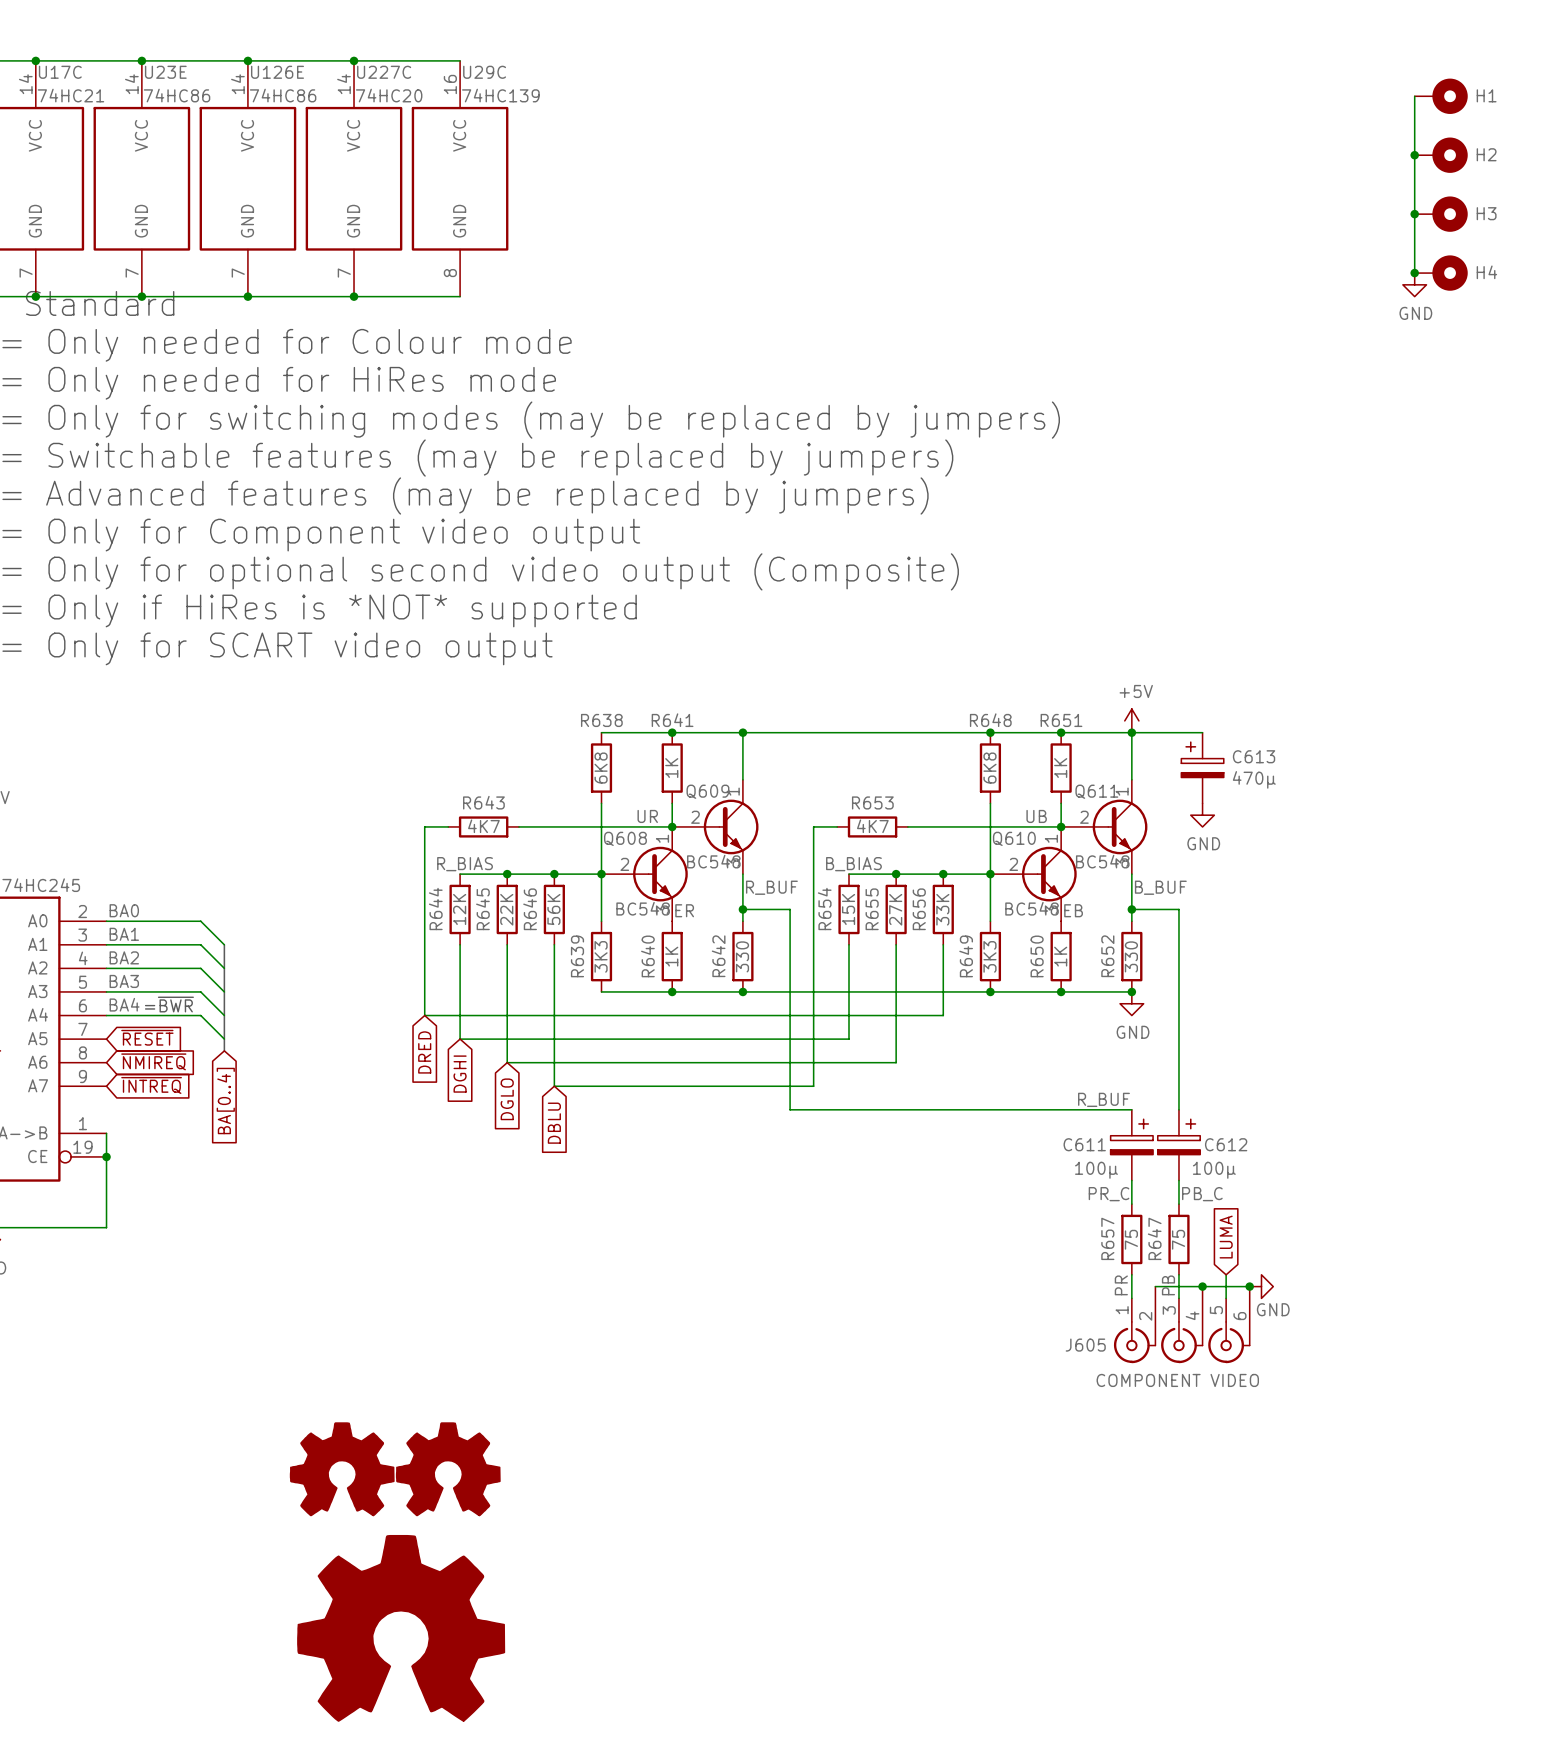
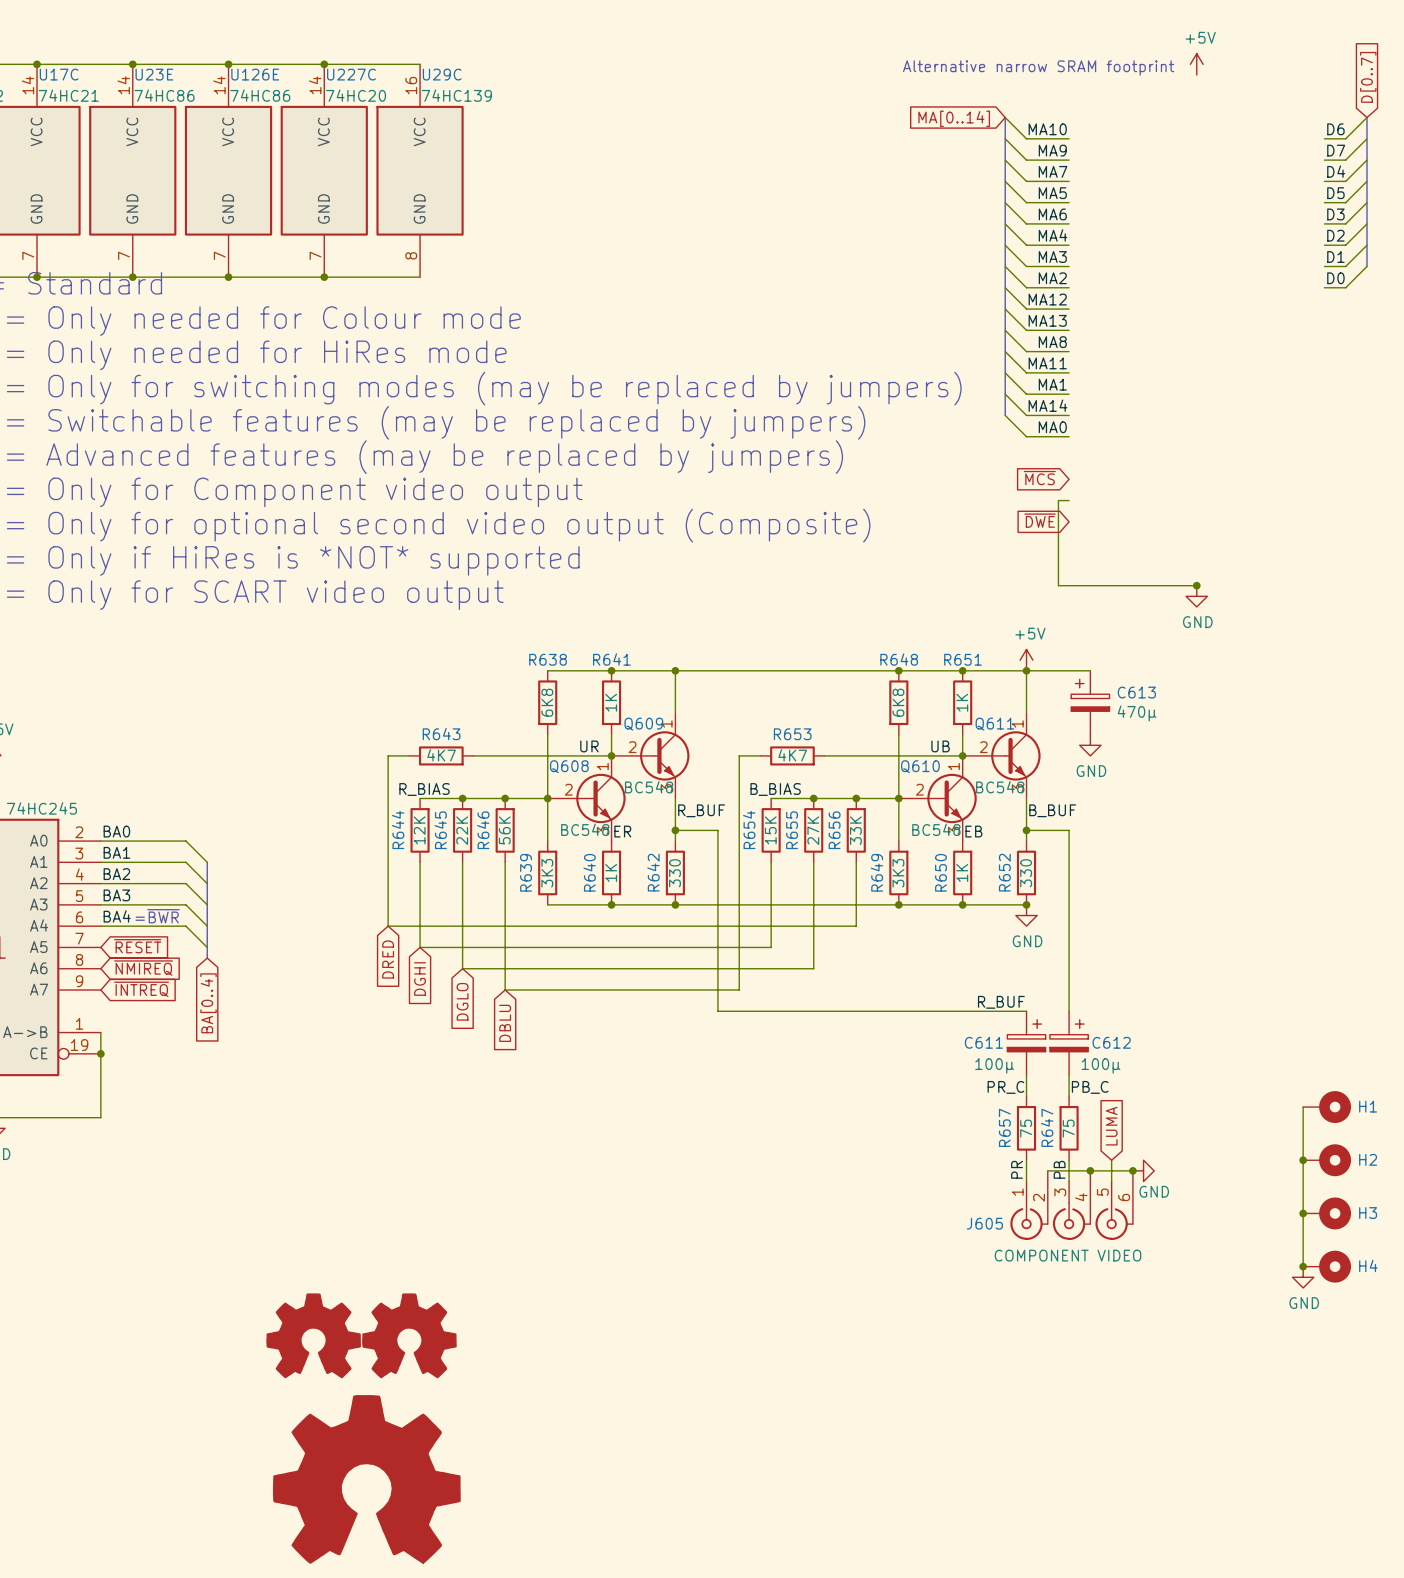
power symbol: none -> +5V (1196, 64)
text: none -> Alternative narrow SRAM footprint (1038, 68)
global label: none -> D[0..7] (1368, 77)
wire: (1414, 96) (1414, 273) -> none
H1 position: (1441, 96) -> (1327, 1107)
wire: none -> (1005, 117) (1026, 138) (1069, 138)
bus: none -> (1005, 117) (1005, 415)
wire: none -> (1366, 117) (1345, 138) (1324, 138)
bus: none -> (1366, 117) (1366, 266)
global label: none -> MA[0..14] (954, 118)
label: none -> MA10 (1047, 129)
label: none -> D6 (1335, 129)
wire: none -> (1005, 138) (1026, 160) (1069, 160)
wire: none -> (1366, 138) (1345, 160) (1324, 160)
junction: (1414, 155) -> none
H2 position: (1441, 155) -> (1327, 1160)
label: none -> MA9 (1052, 150)
label: none -> D7 (1336, 150)
wire: none -> (1005, 160) (1026, 181) (1069, 181)
wire: none -> (1366, 160) (1345, 181) (1324, 181)
label: none -> D4 (1336, 171)
label: none -> MA7 (1053, 171)
wire: none -> (1005, 181) (1026, 202) (1069, 202)
wire: none -> (1366, 181) (1345, 202) (1324, 202)
label: none -> MA5 (1052, 193)
label: none -> D5 (1335, 193)
wire: none -> (1005, 202) (1026, 223) (1069, 223)
junction: (1414, 214) -> none
H3 position: (1441, 214) -> (1327, 1213)
wire: none -> (1366, 202) (1345, 223) (1324, 223)
label: none -> MA6 (1052, 214)
label: none -> D3 (1335, 214)
wire: none -> (1005, 223) (1026, 245) (1069, 245)
wire: none -> (1366, 223) (1345, 245) (1324, 245)
label: none -> MA4 (1053, 235)
label: none -> D2 (1335, 235)
wire: none -> (1005, 245) (1026, 266) (1069, 266)
wire: none -> (1366, 245) (1345, 266) (1324, 266)
junction: (1414, 273) -> none
H4 position: (1441, 273) -> (1327, 1266)
label: none -> MA3 (1052, 257)
label: none -> D1 (1335, 257)
wire: none -> (1005, 266) (1026, 287) (1069, 287)
power symbol: GND (1414, 284) -> none
wire: none -> (1366, 266) (1345, 287) (1324, 287)
label: none -> MA2 (1052, 278)
label: none -> D0 (1335, 278)
wire: none -> (1005, 287) (1026, 309) (1069, 309)
label: none -> MA12 (1047, 299)
wire: none -> (1005, 309) (1026, 330) (1069, 330)
label: none -> MA13 (1047, 320)
wire: none -> (1005, 330) (1026, 351) (1069, 351)
label: none -> MA8 (1052, 342)
wire: none -> (1005, 351) (1026, 372) (1069, 372)
label: none -> MA11 (1047, 363)
wire: none -> (1005, 372) (1026, 394) (1069, 394)
label: none -> MA1 (1052, 384)
wire: none -> (1005, 394) (1026, 415) (1069, 415)
label: none -> MA14 (1047, 405)
wire: none -> (1005, 415) (1026, 436) (1069, 436)
label: none -> MA0 (1052, 427)
global label: none -> ~{MCS} (1039, 478)
wire: none -> (1069, 500) (1058, 500) (1058, 585) (1196, 585)
global label: none -> ~{DWE} (1040, 520)
junction: none -> (1196, 585)
power symbol: none -> GND (1196, 596)
wire: none -> (1303, 1107) (1303, 1266)
junction: none -> (1303, 1160)
junction: none -> (1303, 1213)
junction: none -> (1303, 1266)
power symbol: none -> GND (1303, 1277)

